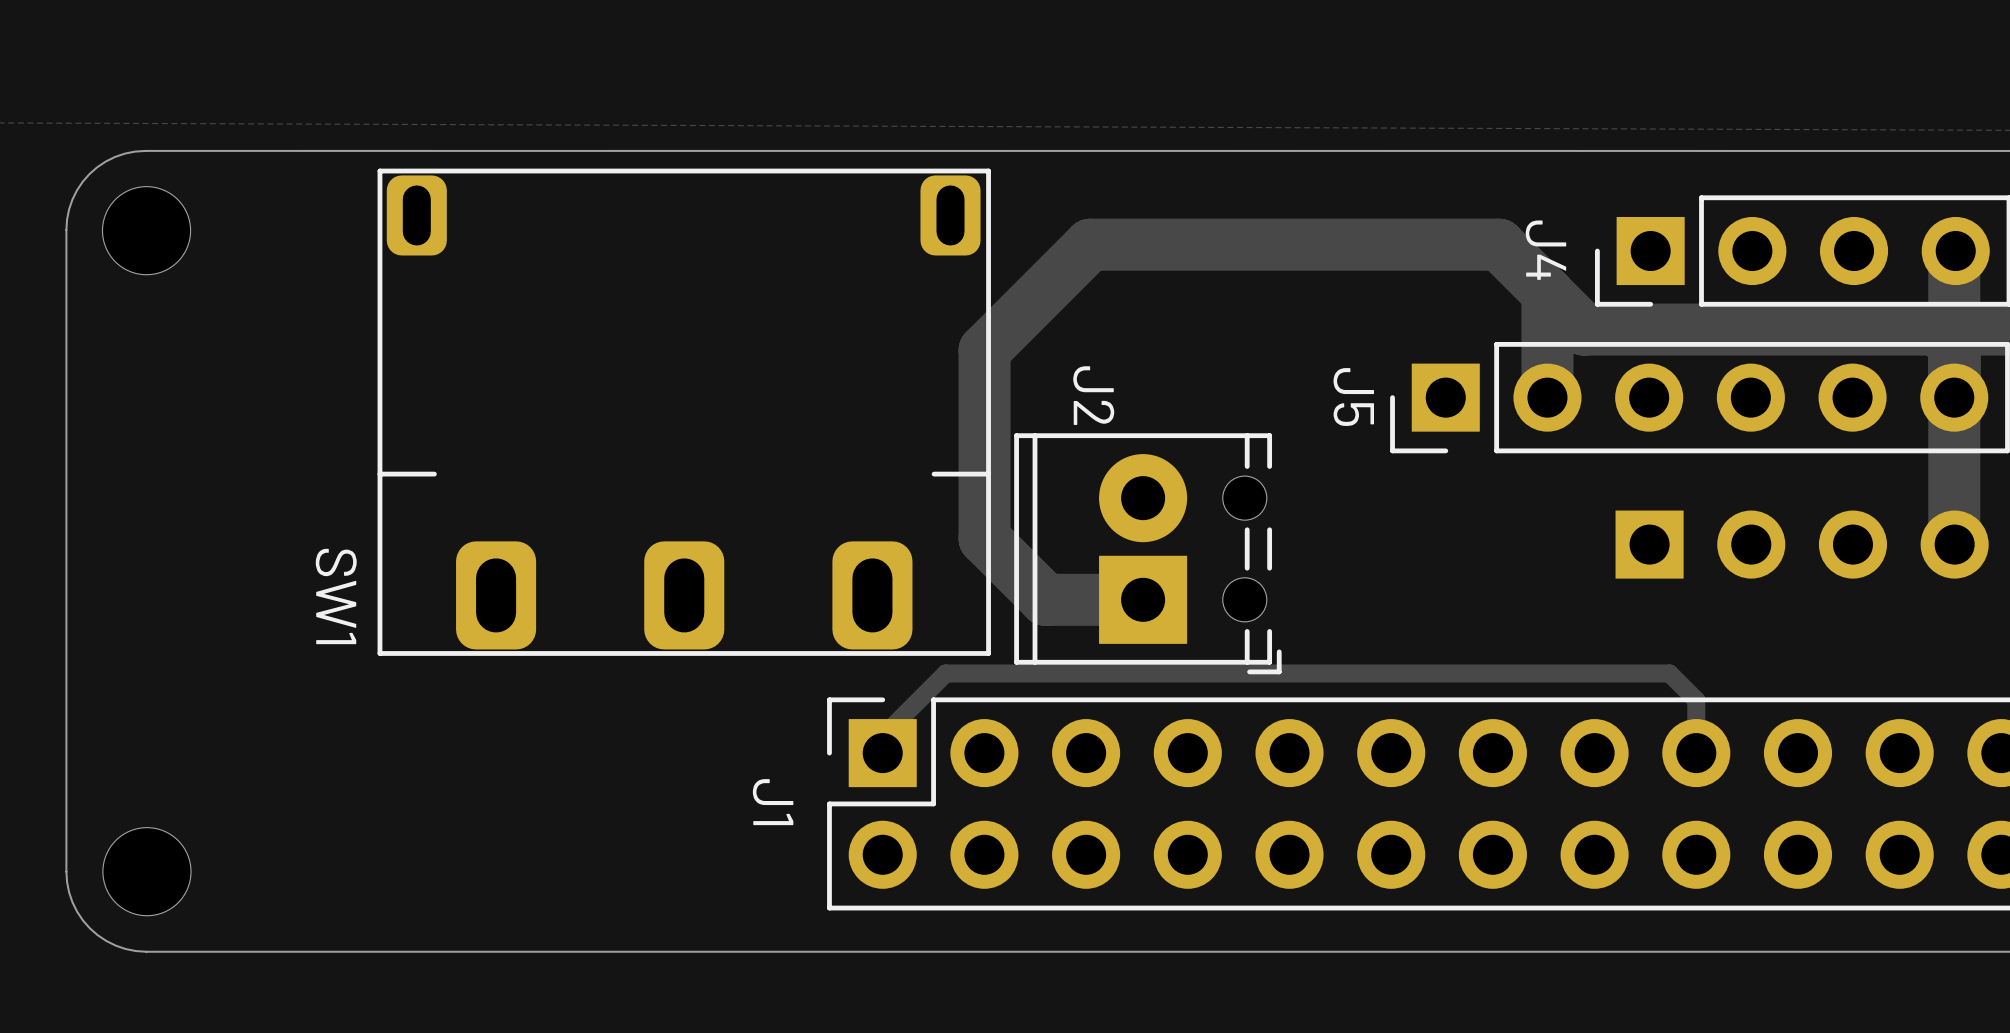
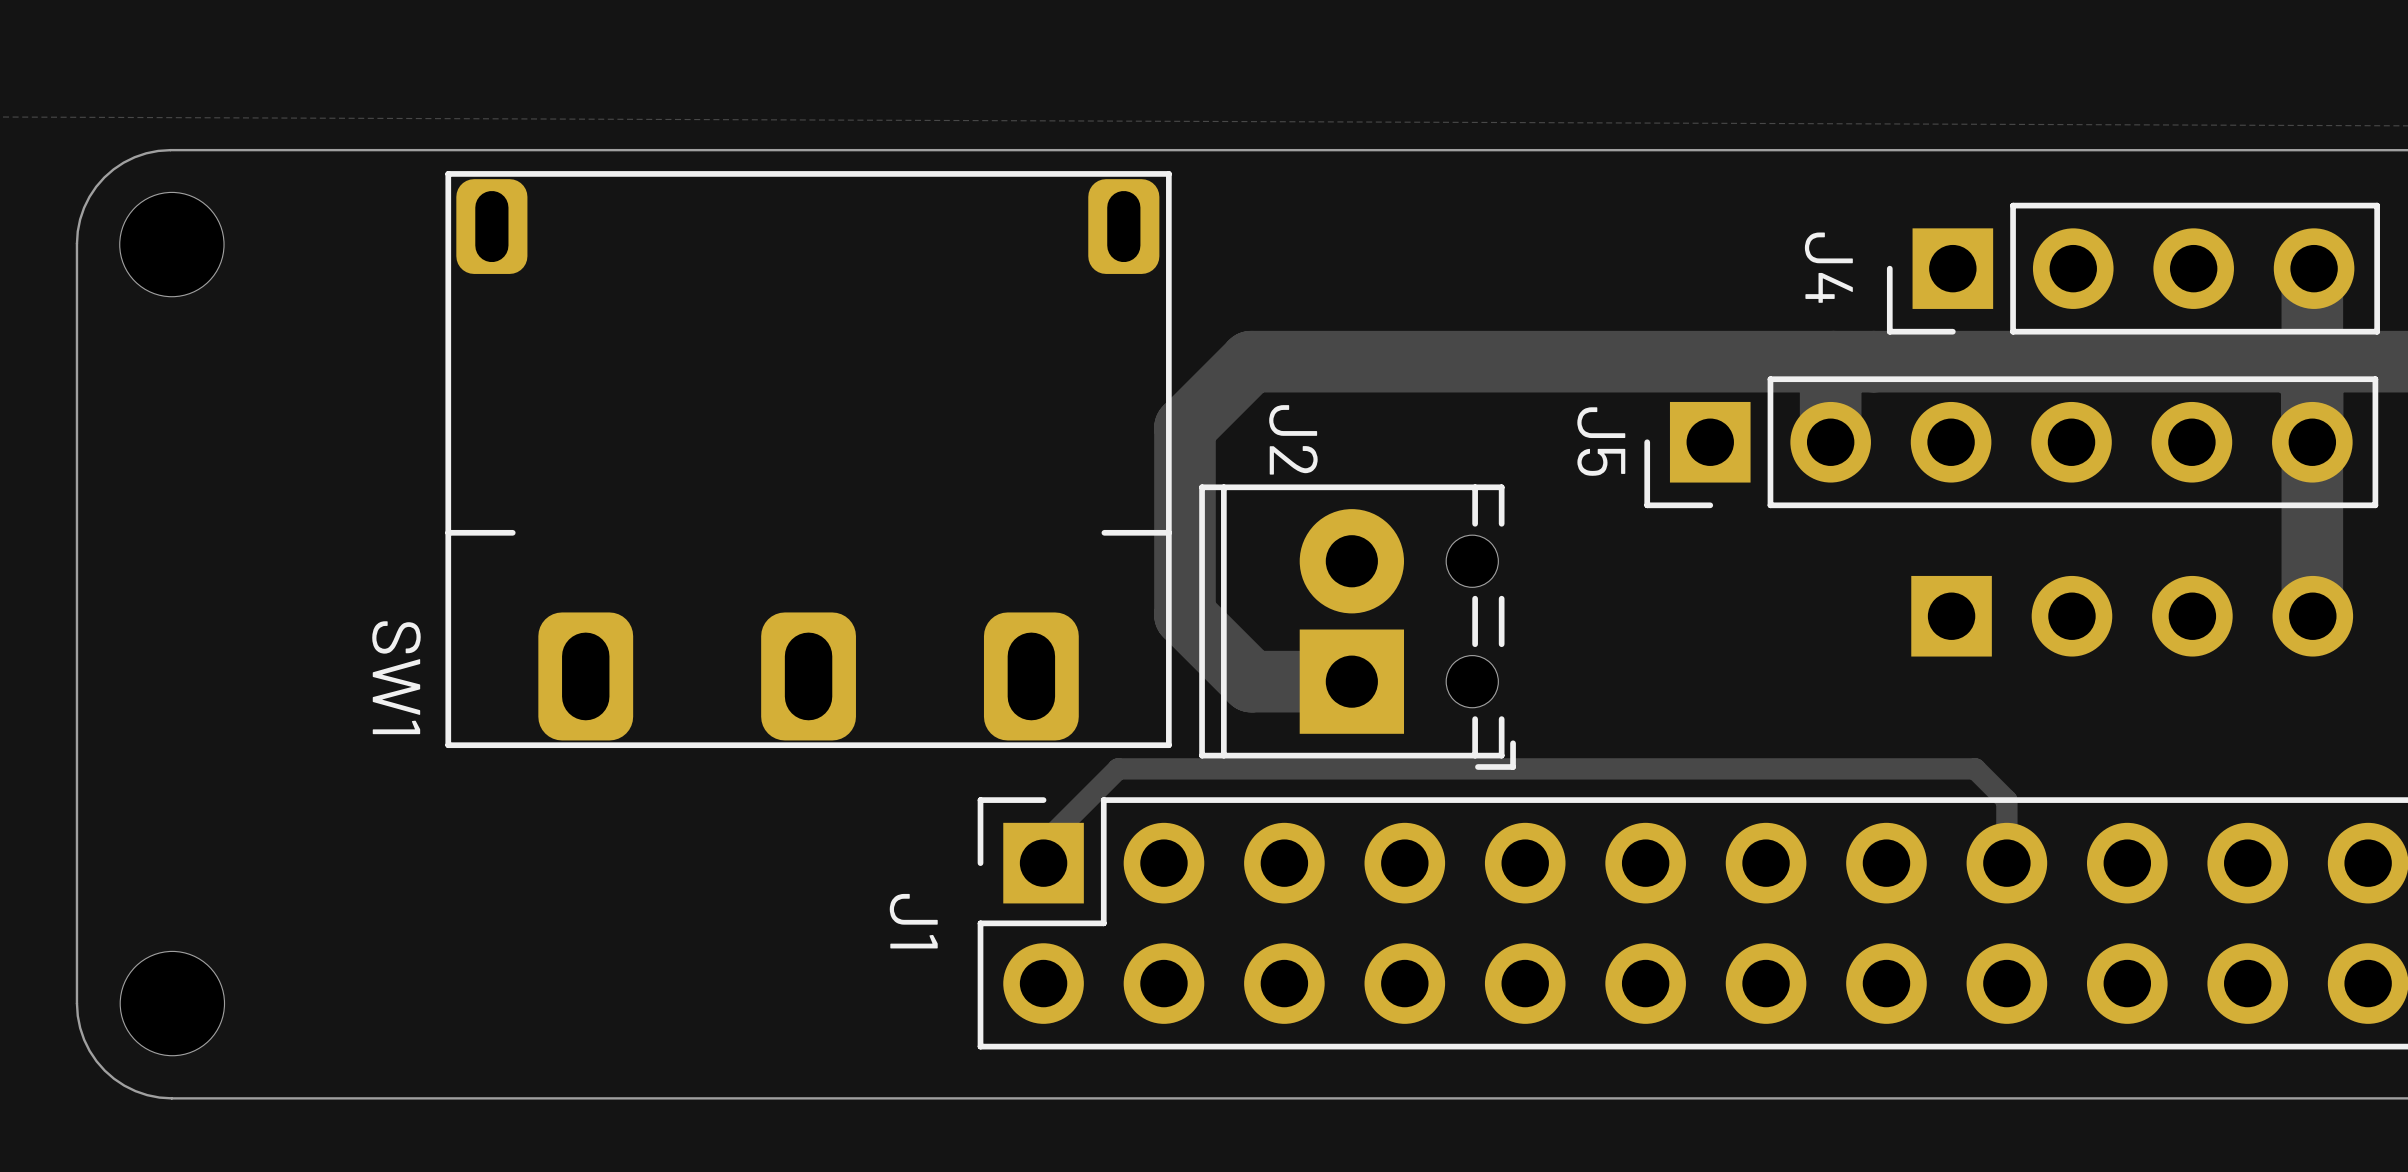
track: (1583, 329) (1499, 244) (1090, 244) (984, 350) (984, 538) (1045, 599) (1058, 599) -> (1873, 361) (1250, 361) (1184, 427) (1184, 615) (1251, 681)

